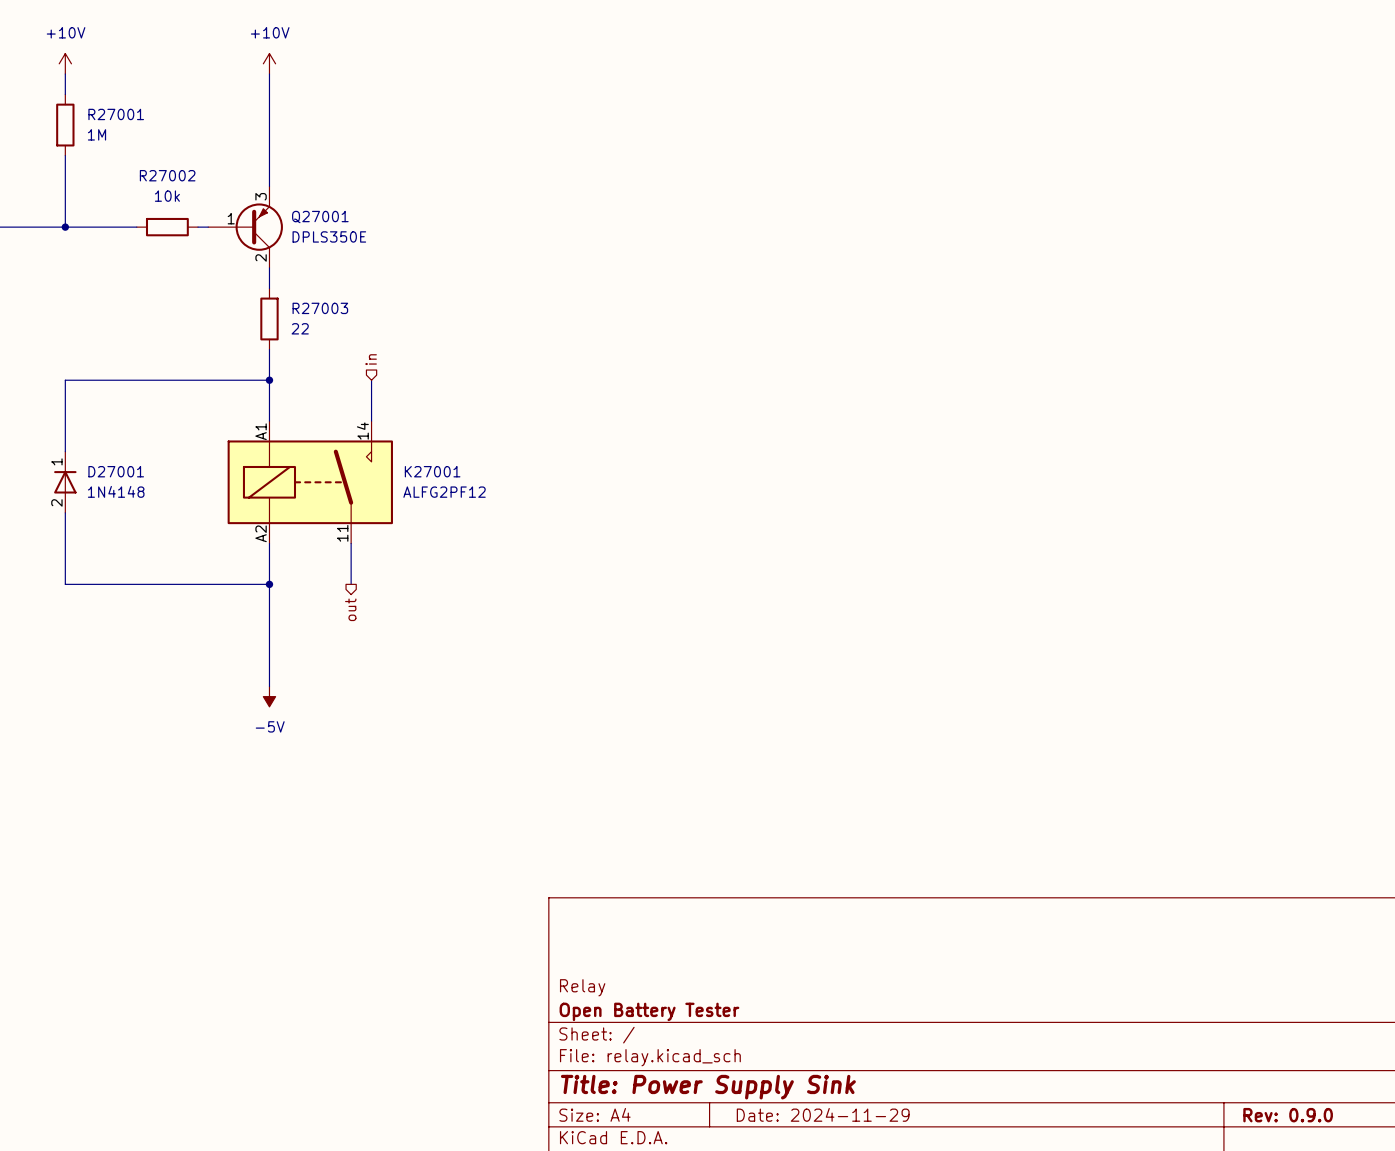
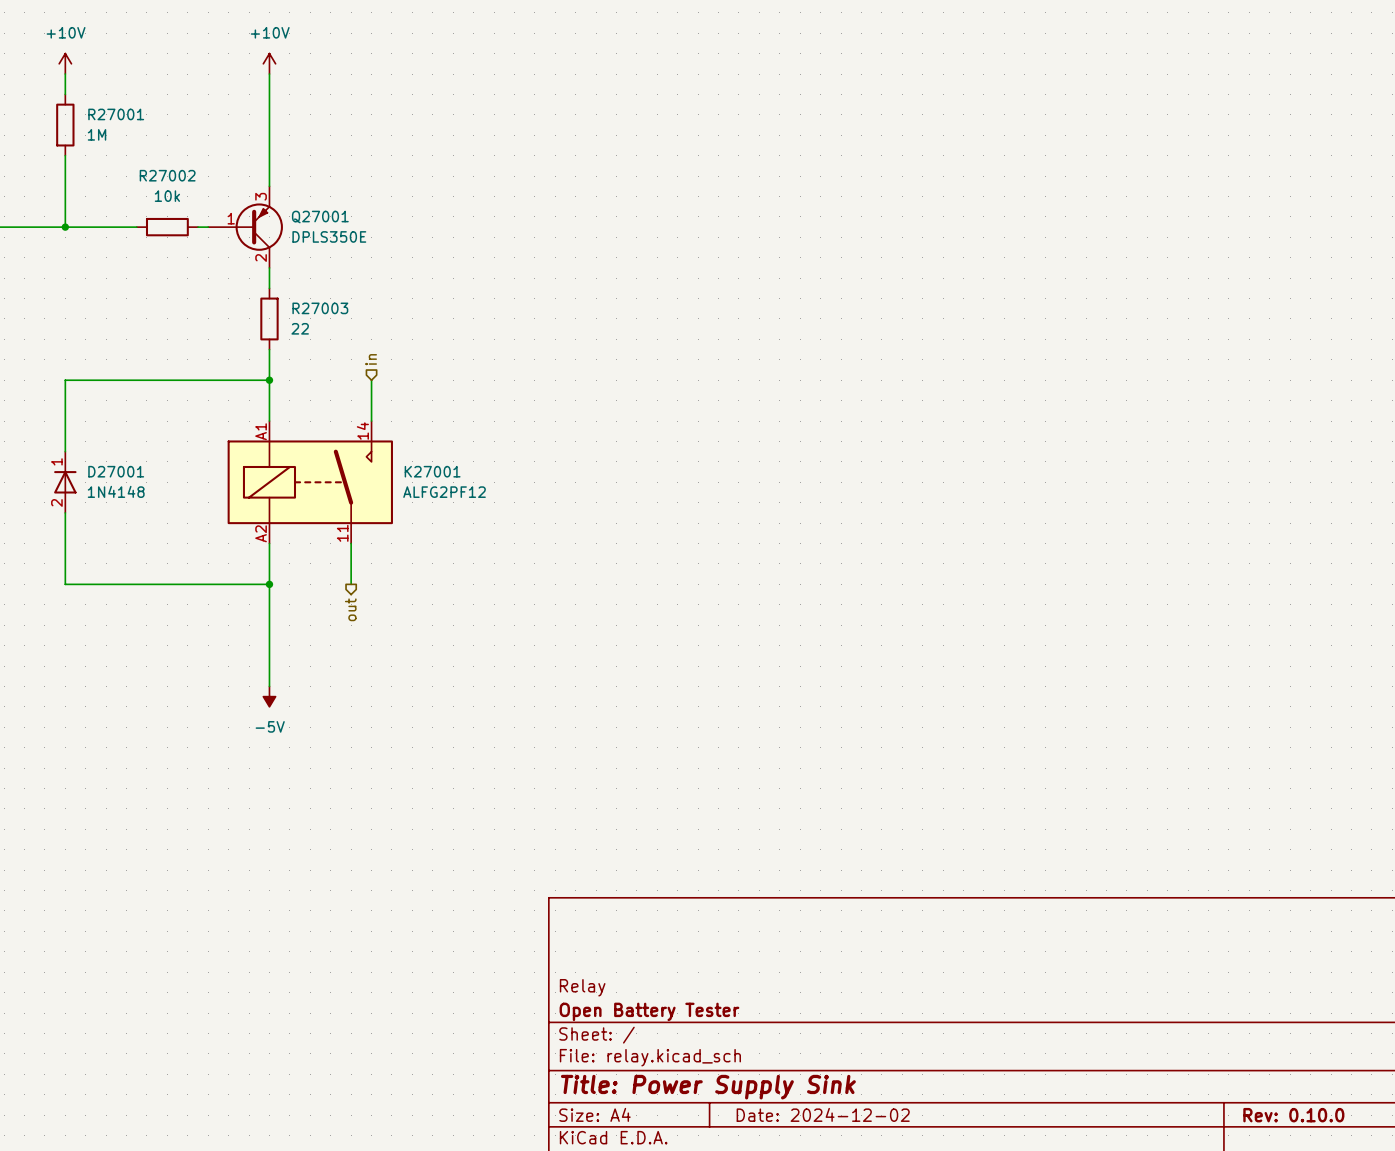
title block: Date: 2024-11-29 (823, 1114) -> Date: 2024-12-02 (823, 1114)
title block: Rev: 0.9.0 (1288, 1115) -> Rev: 0.10.0 (1293, 1115)

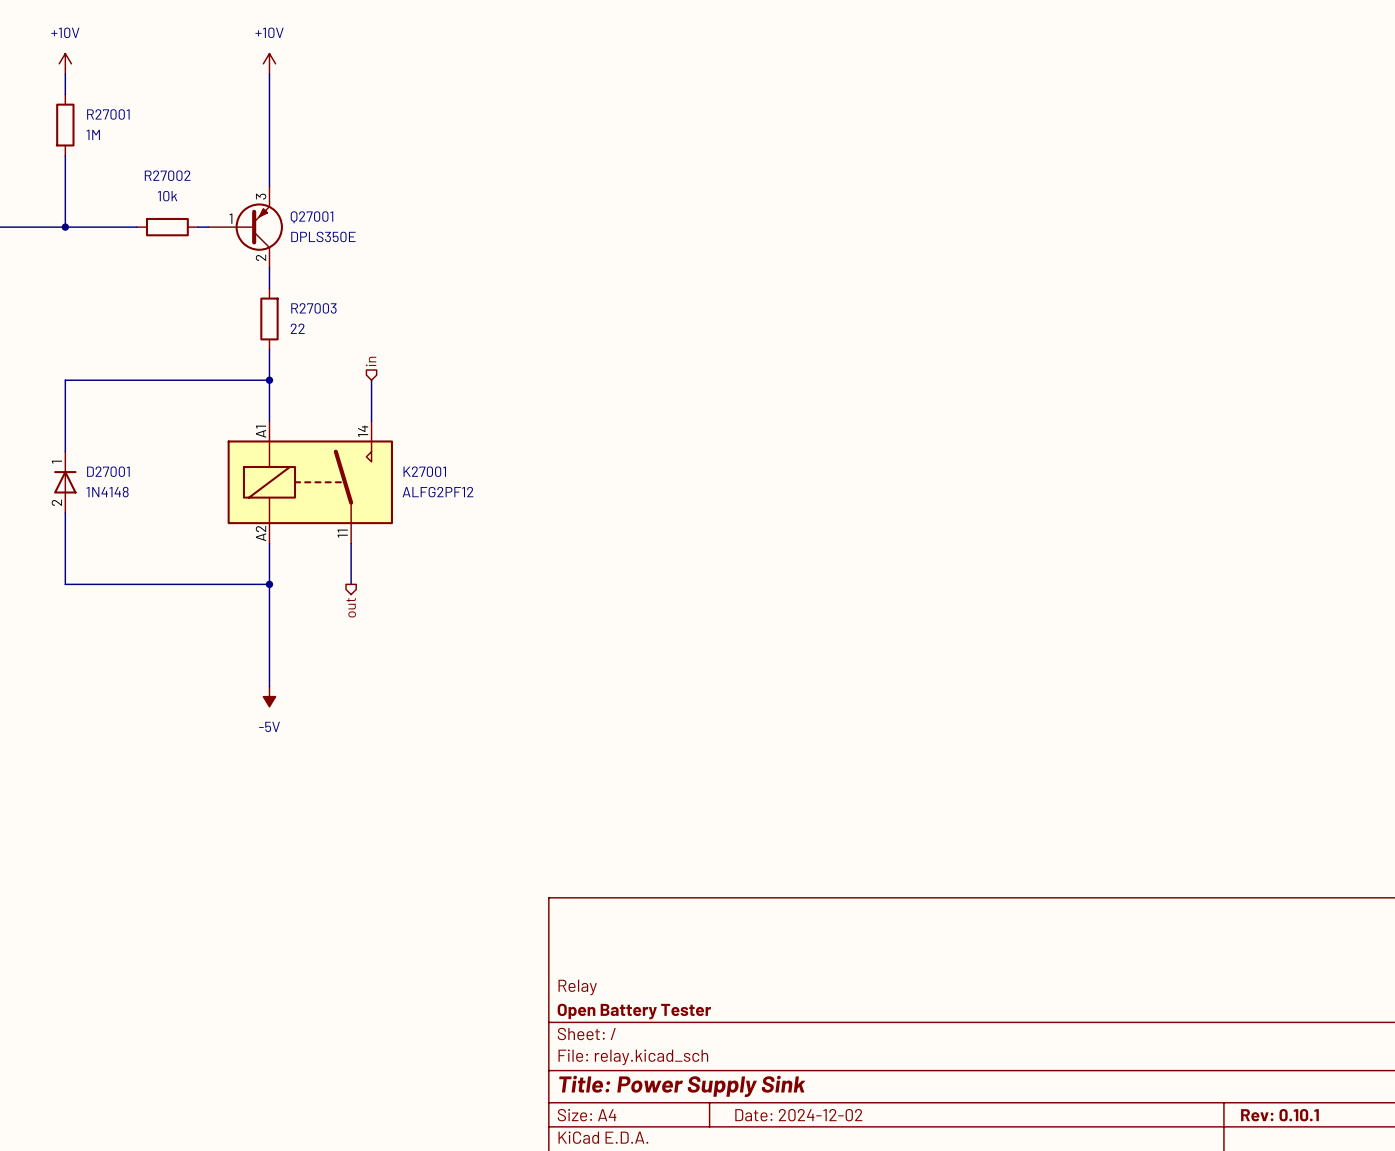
title block: Rev: 0.10.0 (1293, 1115) -> Rev: 0.10.1 (1279, 1115)

